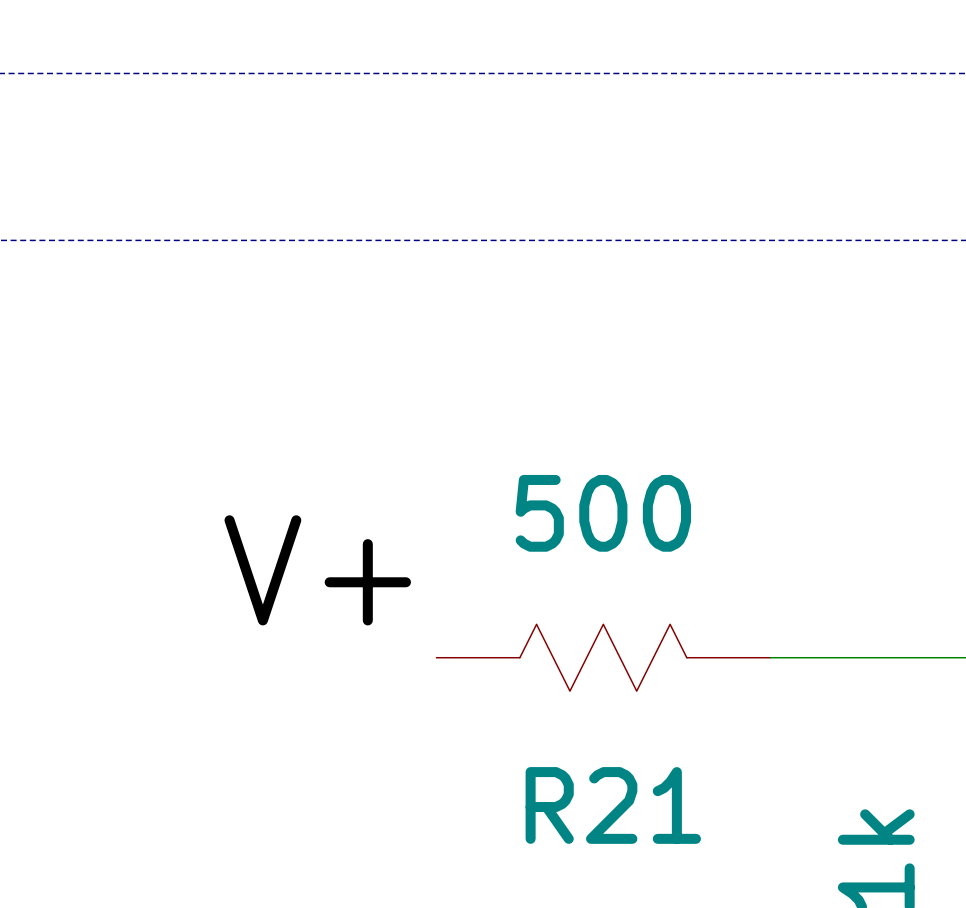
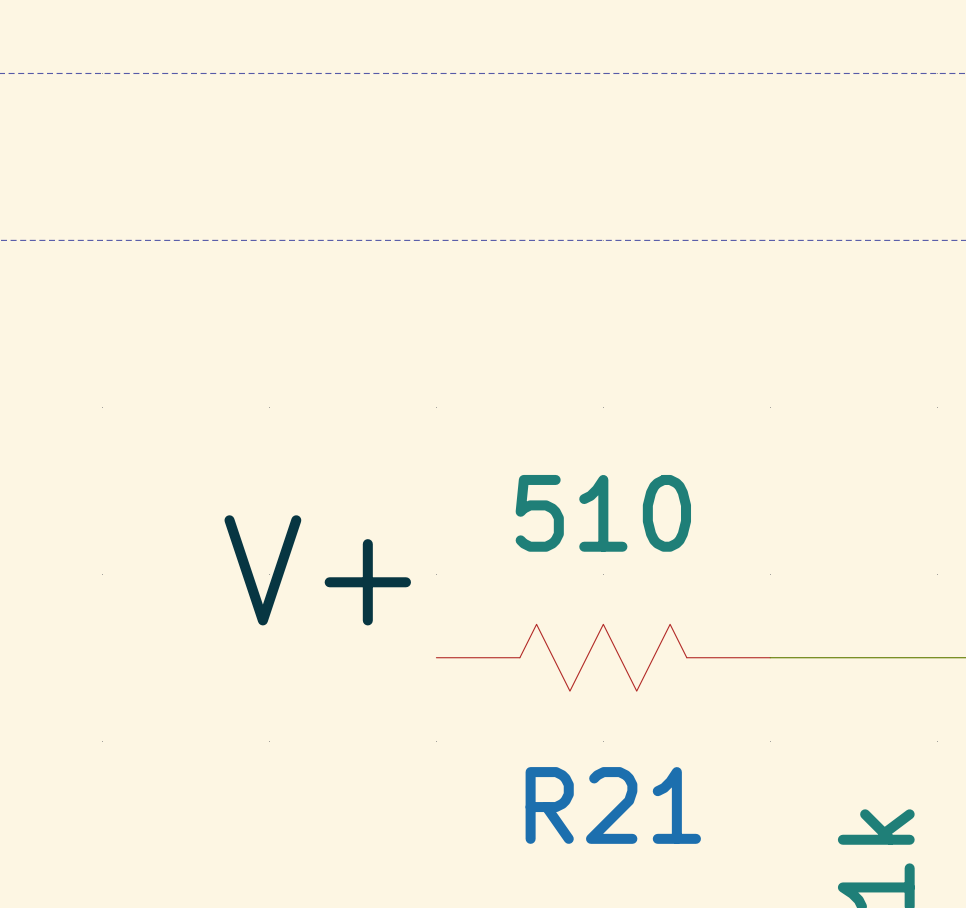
R21 value: 500 (603, 513) -> 510 (603, 513)

